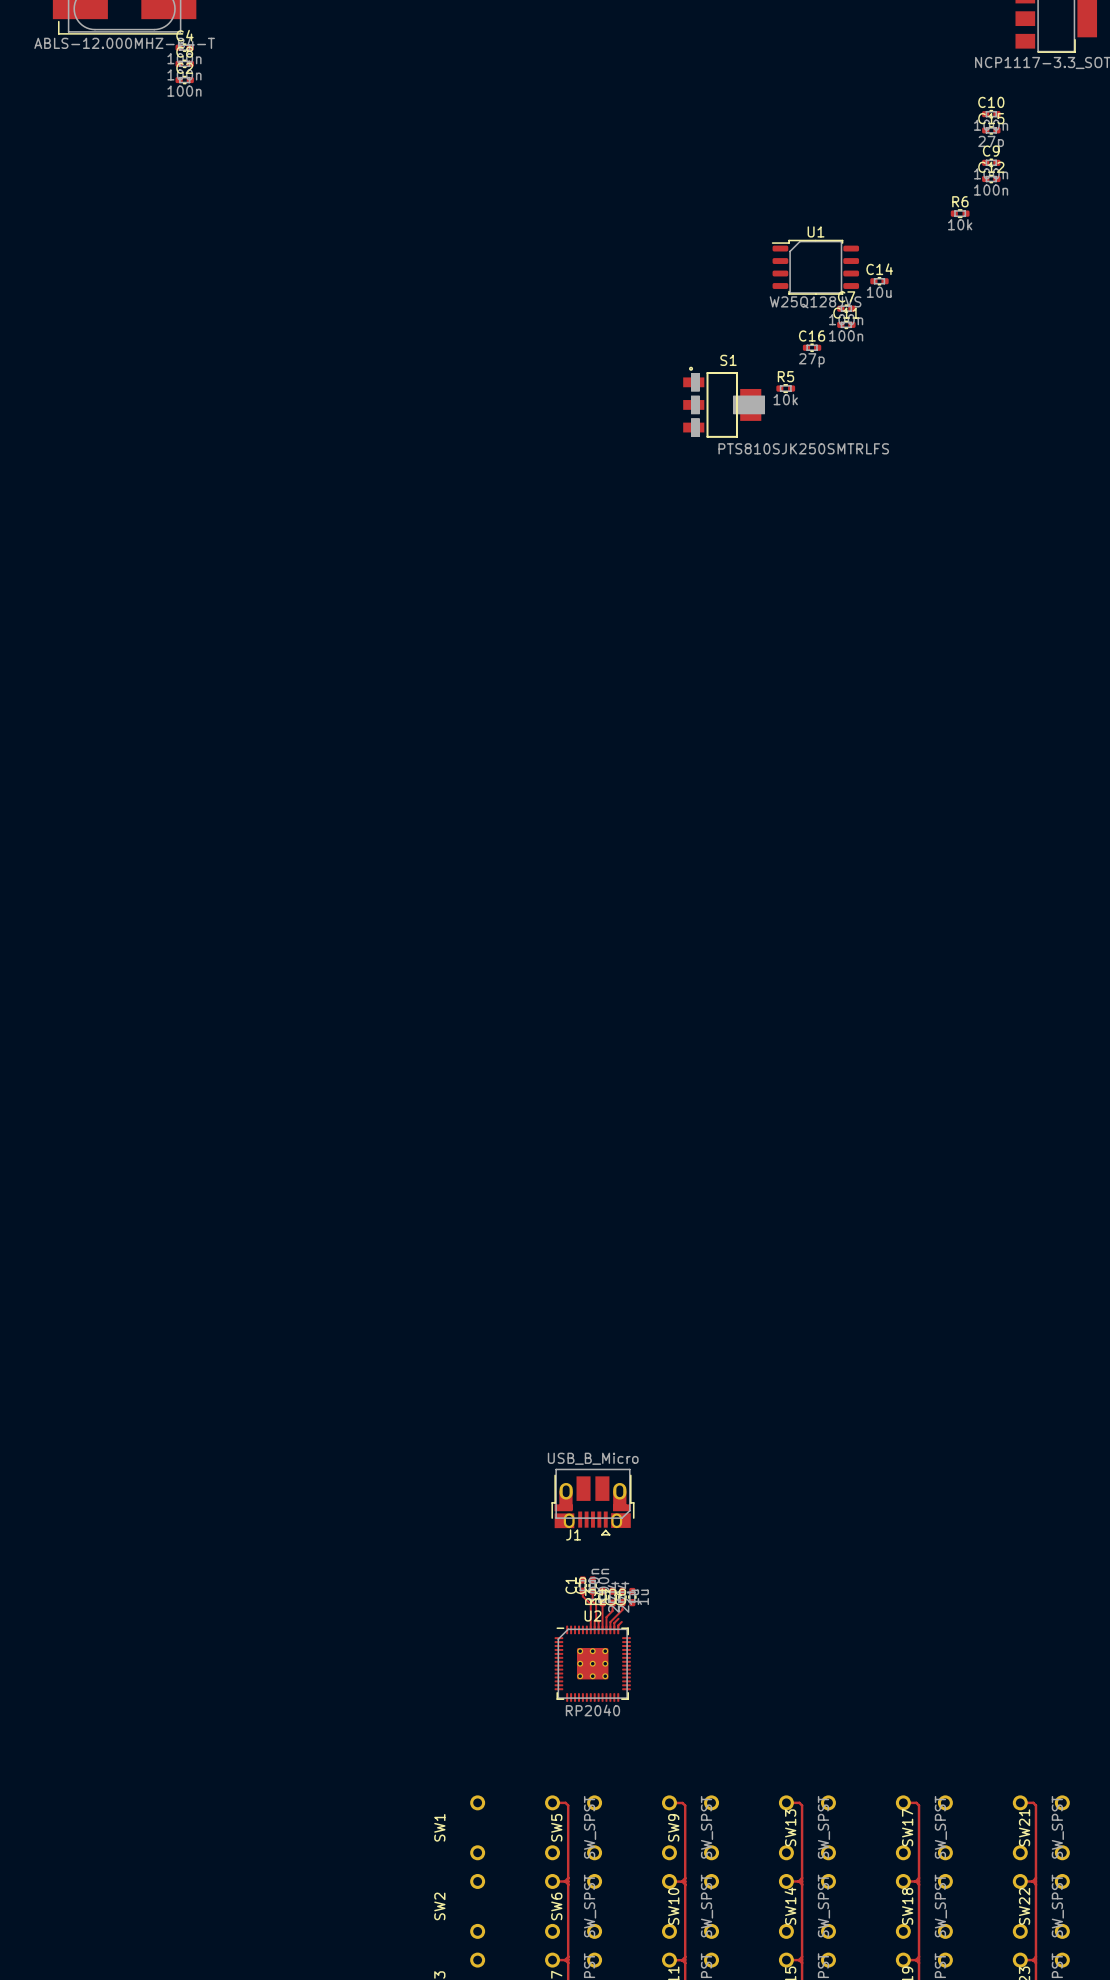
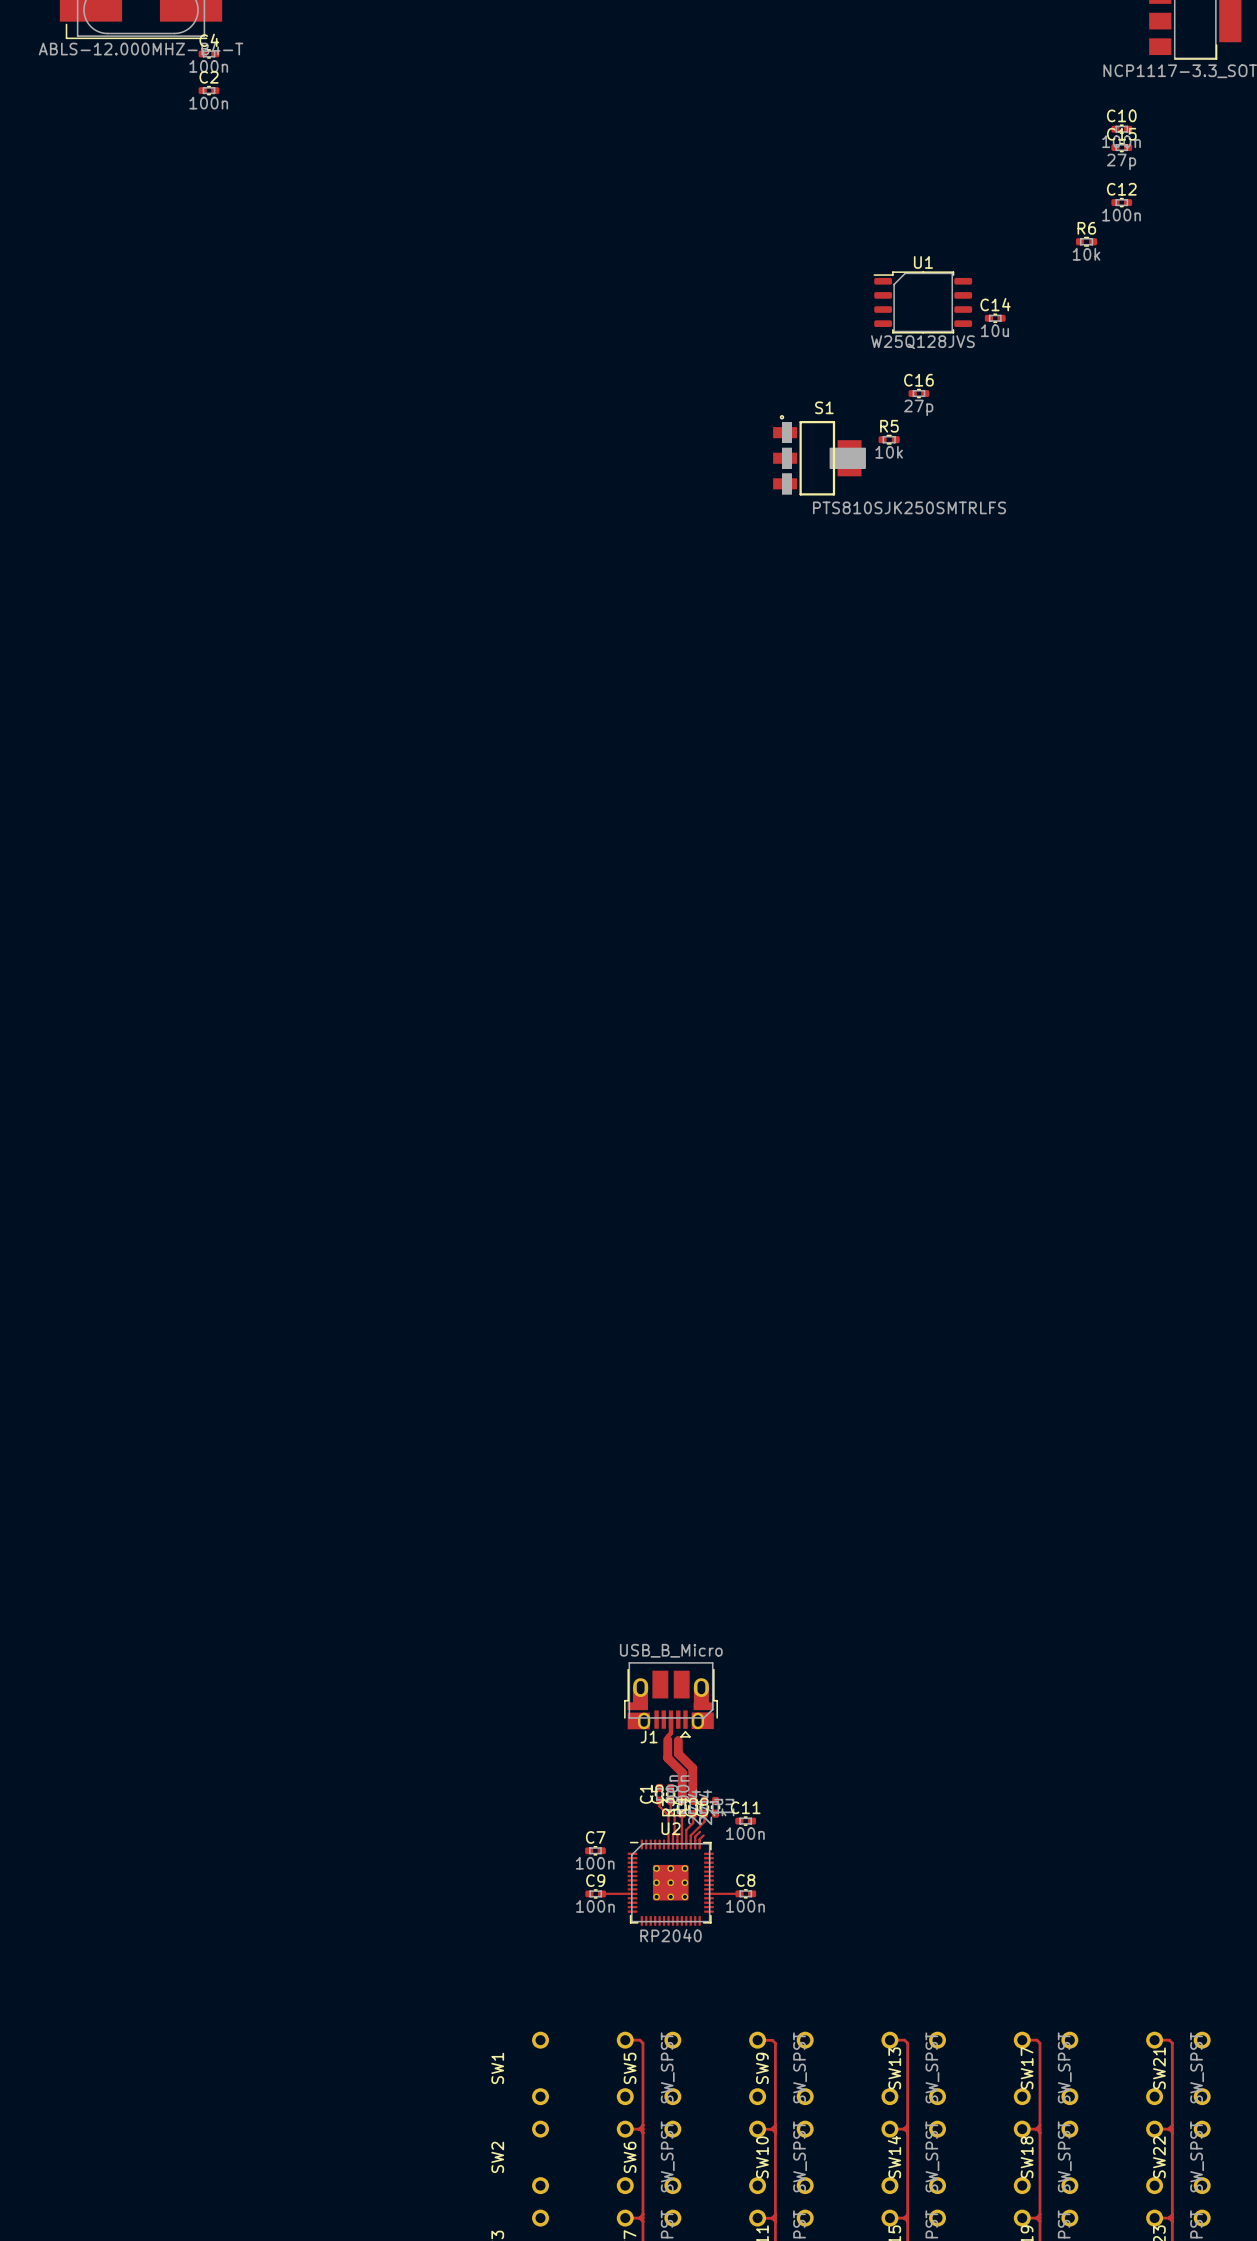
C8 position: (184, 63) -> (745, 1893)
C9 position: (991, 162) -> (595, 1893)
C7 position: (846, 308) -> (595, 1850)
C11 position: (846, 324) -> (745, 1821)
track: none -> (671, 1719) (671, 1733) (667, 1736) (667, 1758) (682, 1772) (681, 1800)
track: none -> (678, 1740) (678, 1753) (692, 1768) (693, 1800)
track: none -> (601, 1893) (632, 1893)
track: none -> (709, 1893) (739, 1893)

